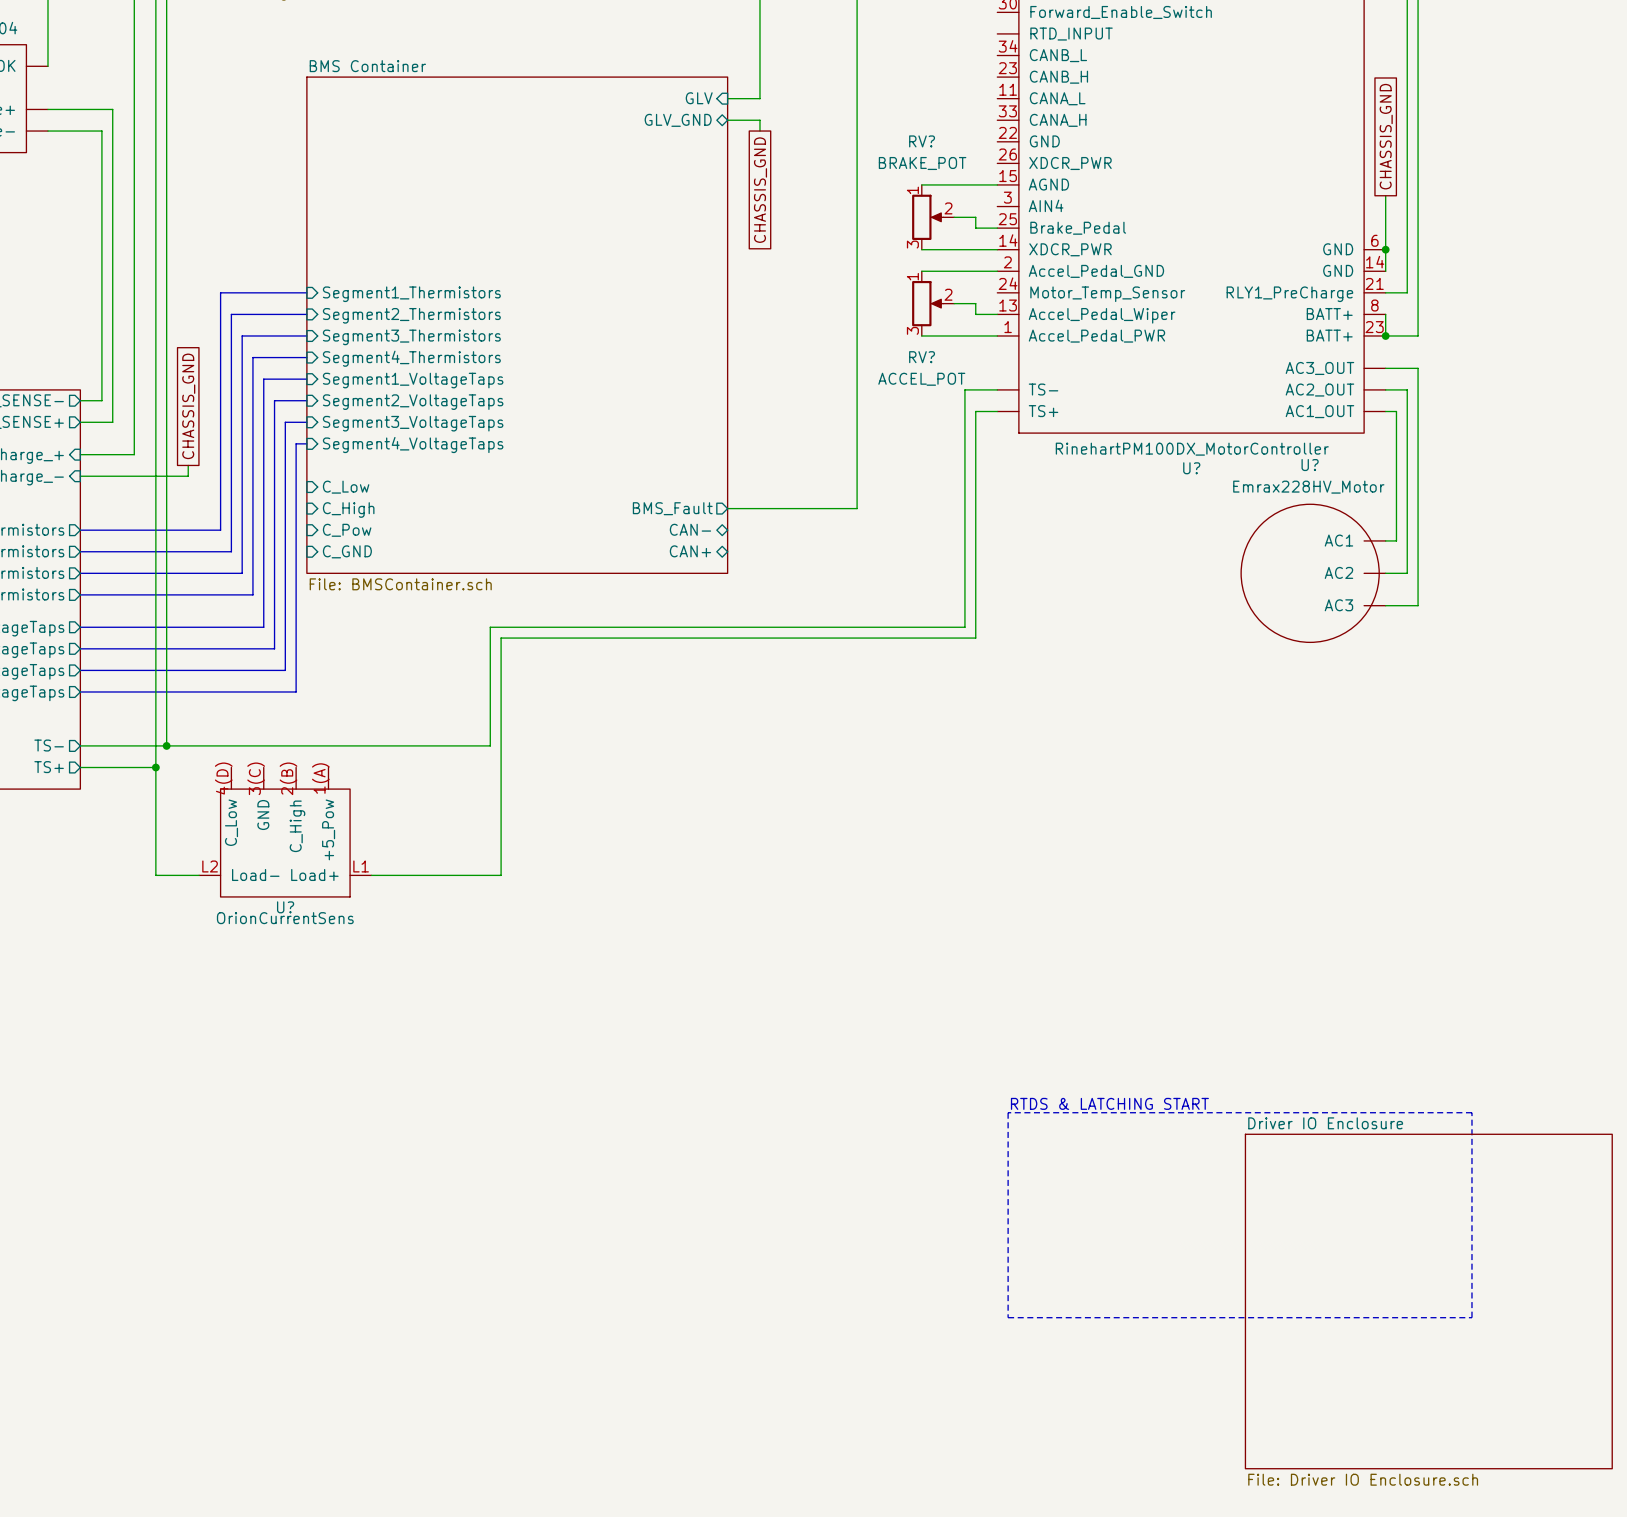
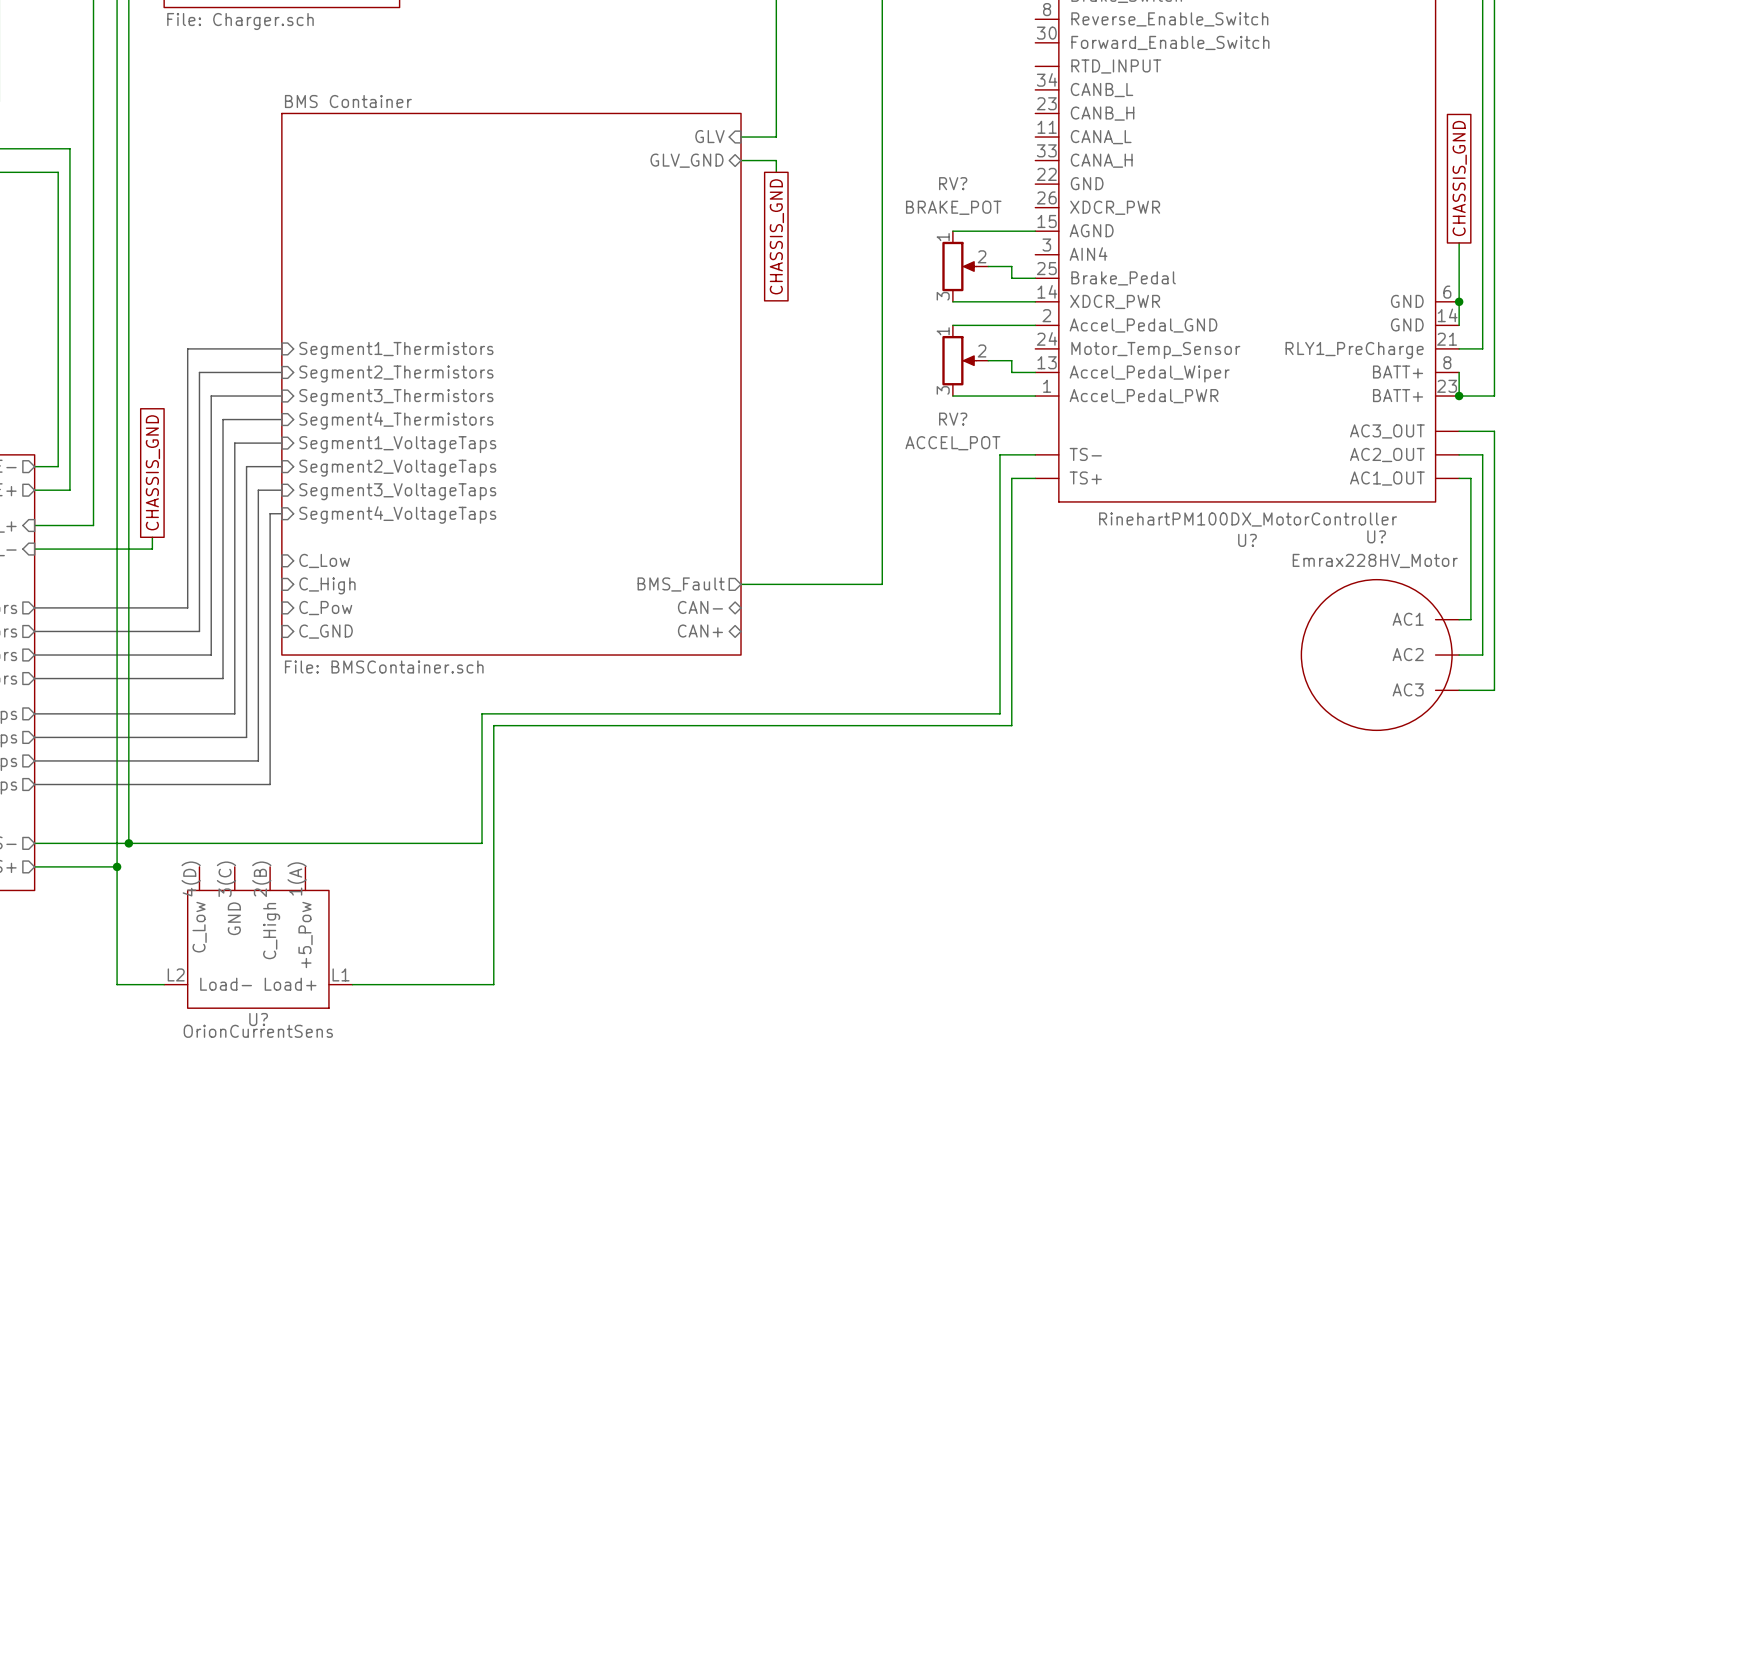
text: RTDS & LATCHING START (1109, 1103) -> none
line: (1008, 1112) (1471, 1112) (1471, 1317) (1008, 1317) (1008, 1112) -> none
sheet Driver IO Enclosure: File: Driver IO Enclosure.sch (1428, 1301) -> none

